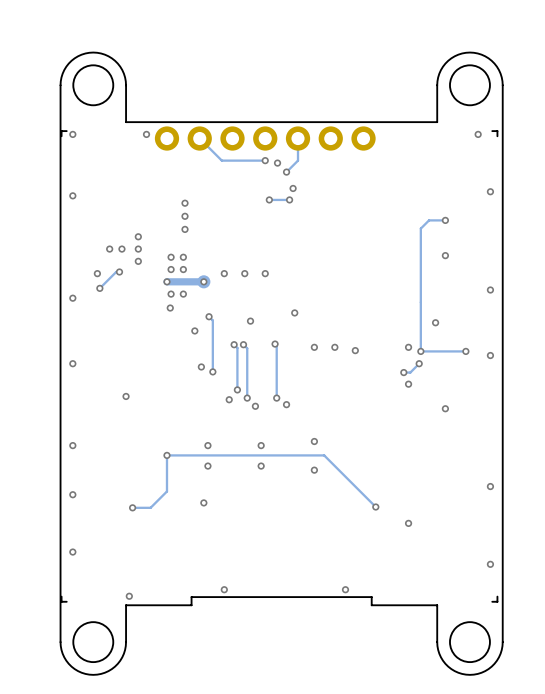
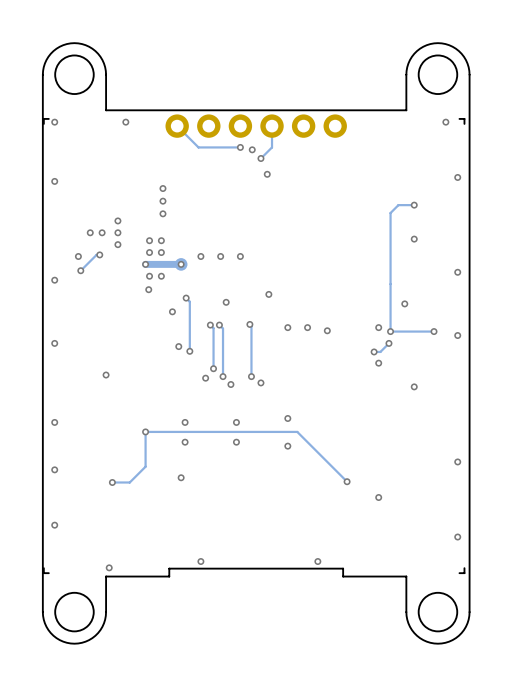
part: (265, 138) -> none
via: (269, 199) -> none
track: (289, 199) (269, 199) -> none
via: (289, 199) -> none

